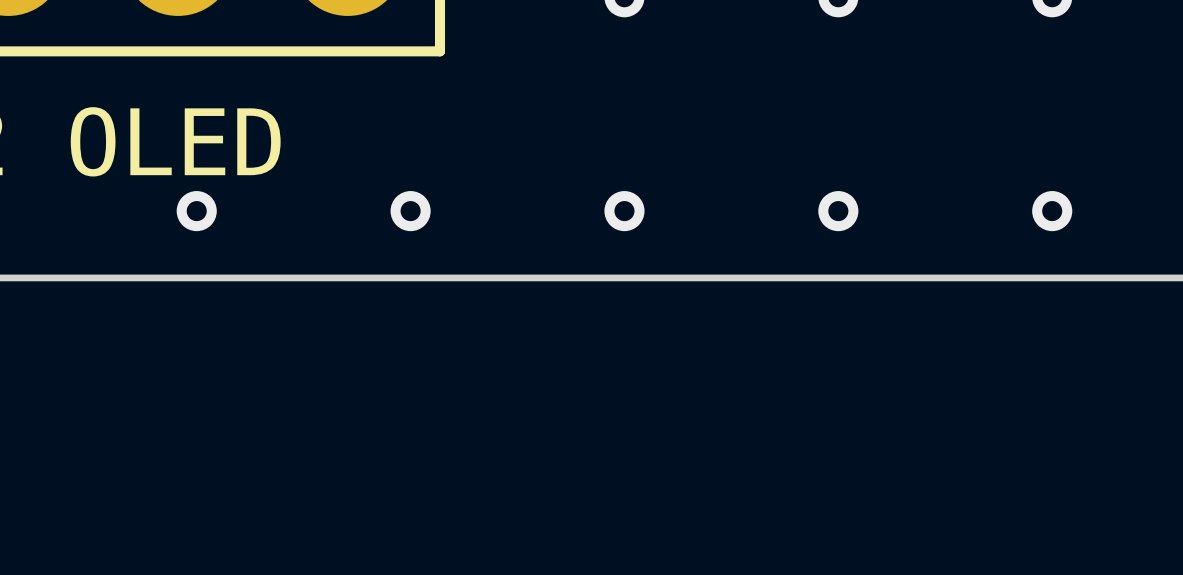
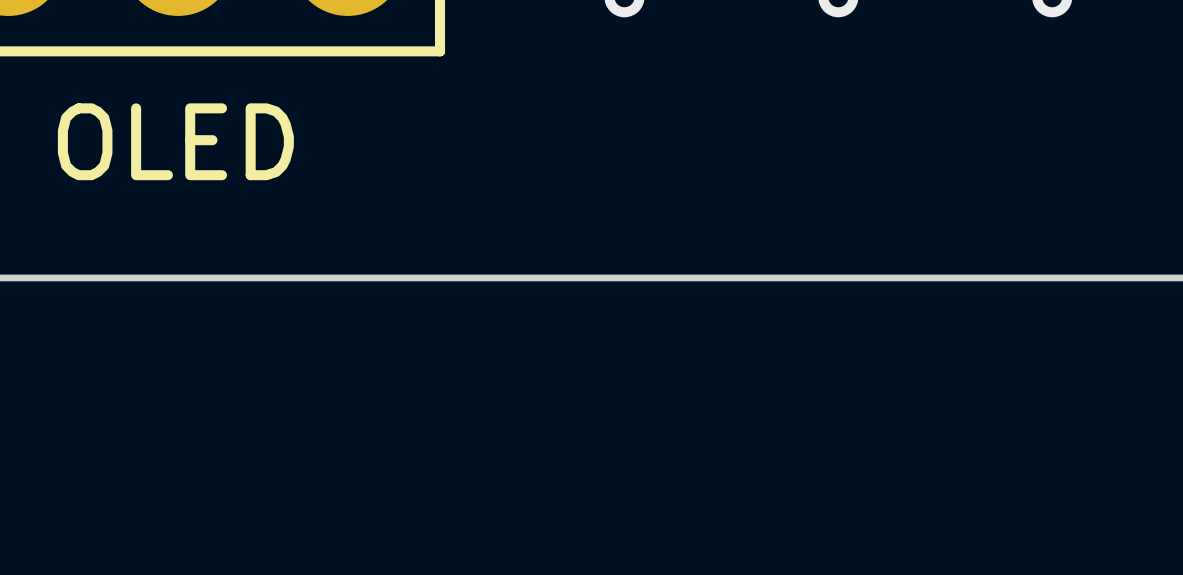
via: (196, 211) -> none
via: (410, 211) -> none
via: (624, 211) -> none
via: (838, 211) -> none
via: (1052, 211) -> none

